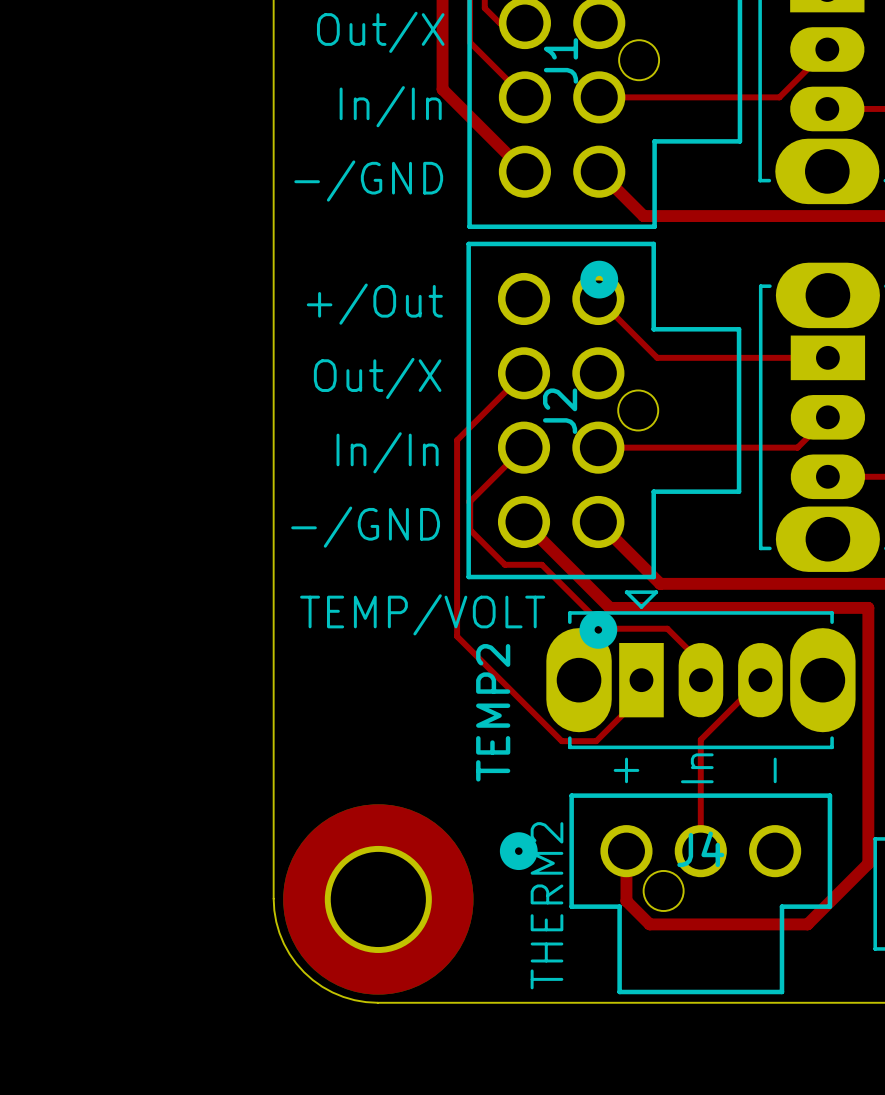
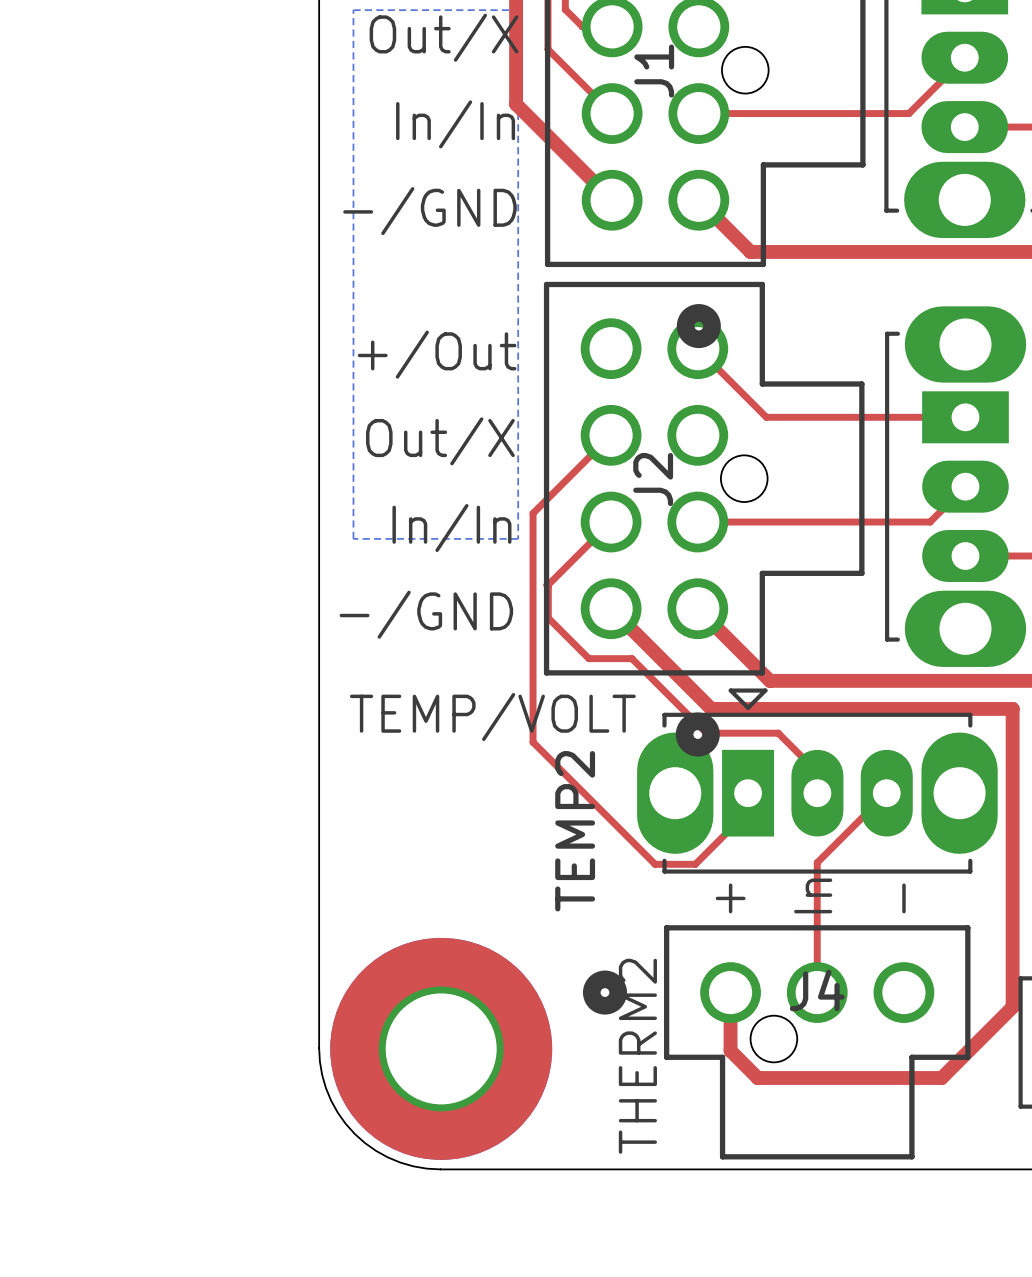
bottom zone outline: none -> (353, 10) (353, 538) (518, 538) (518, 10) (353, 10)

